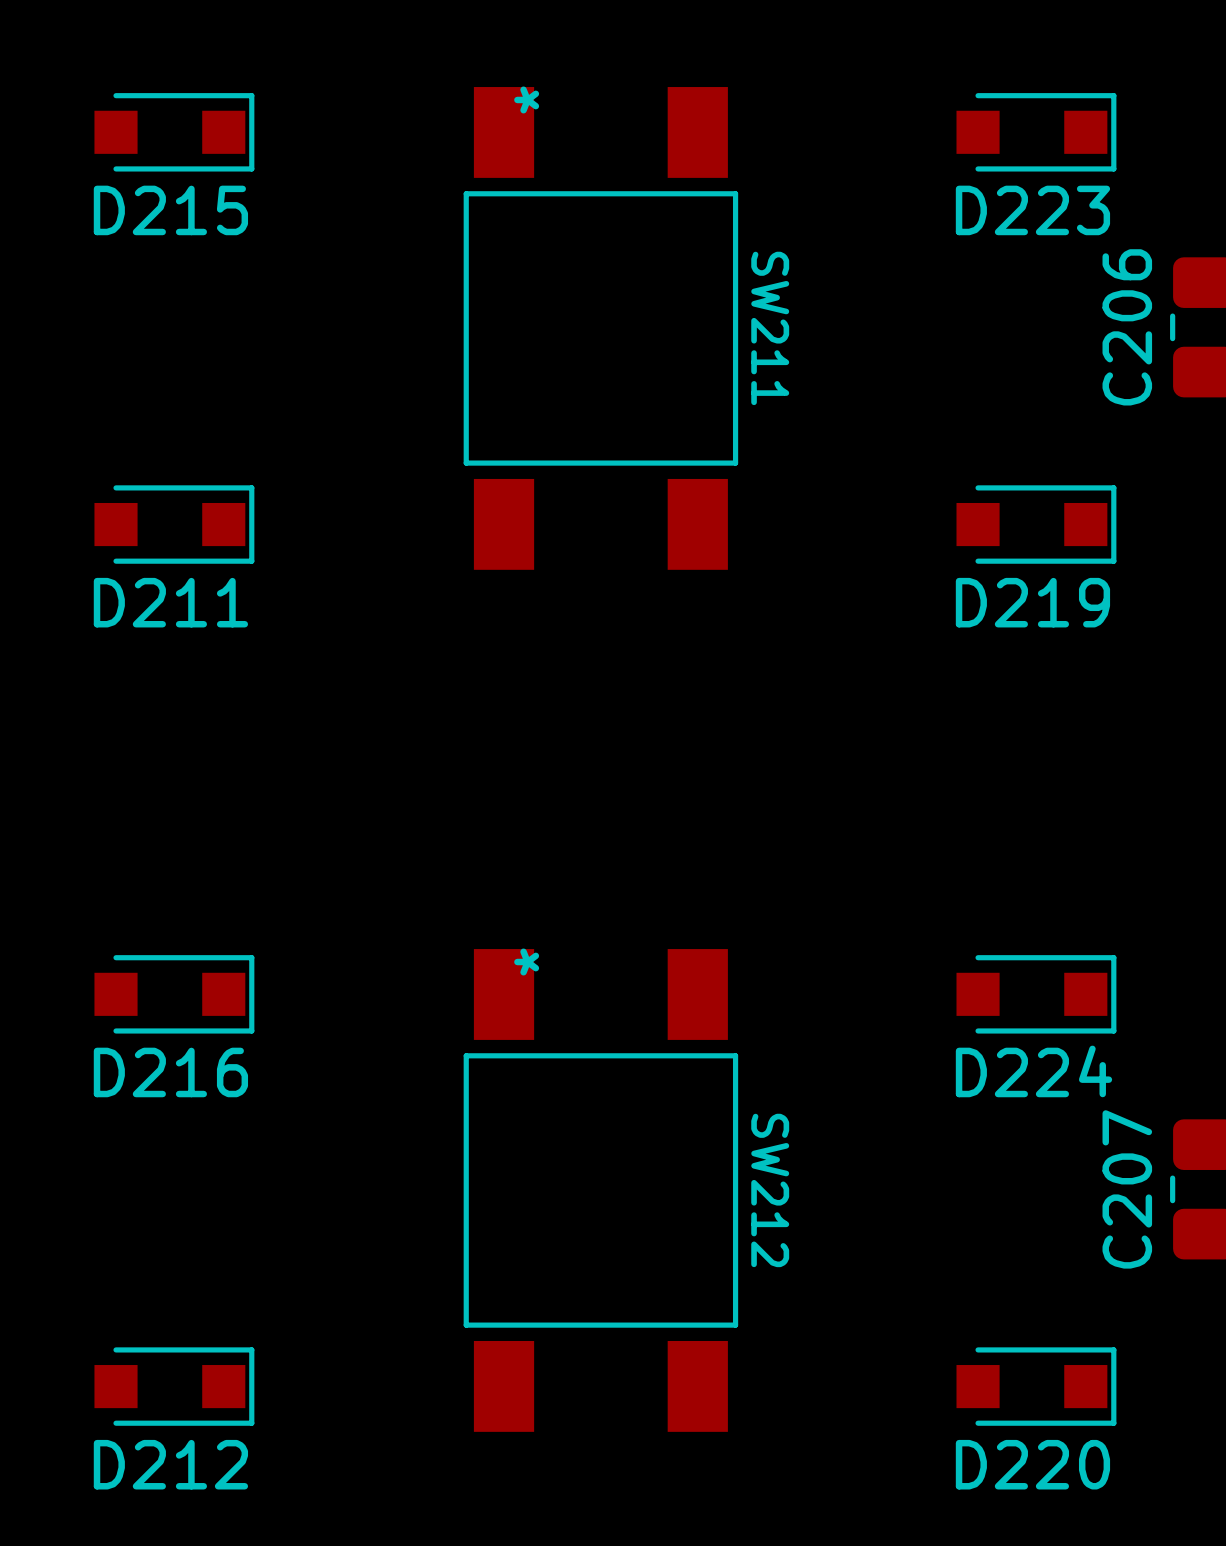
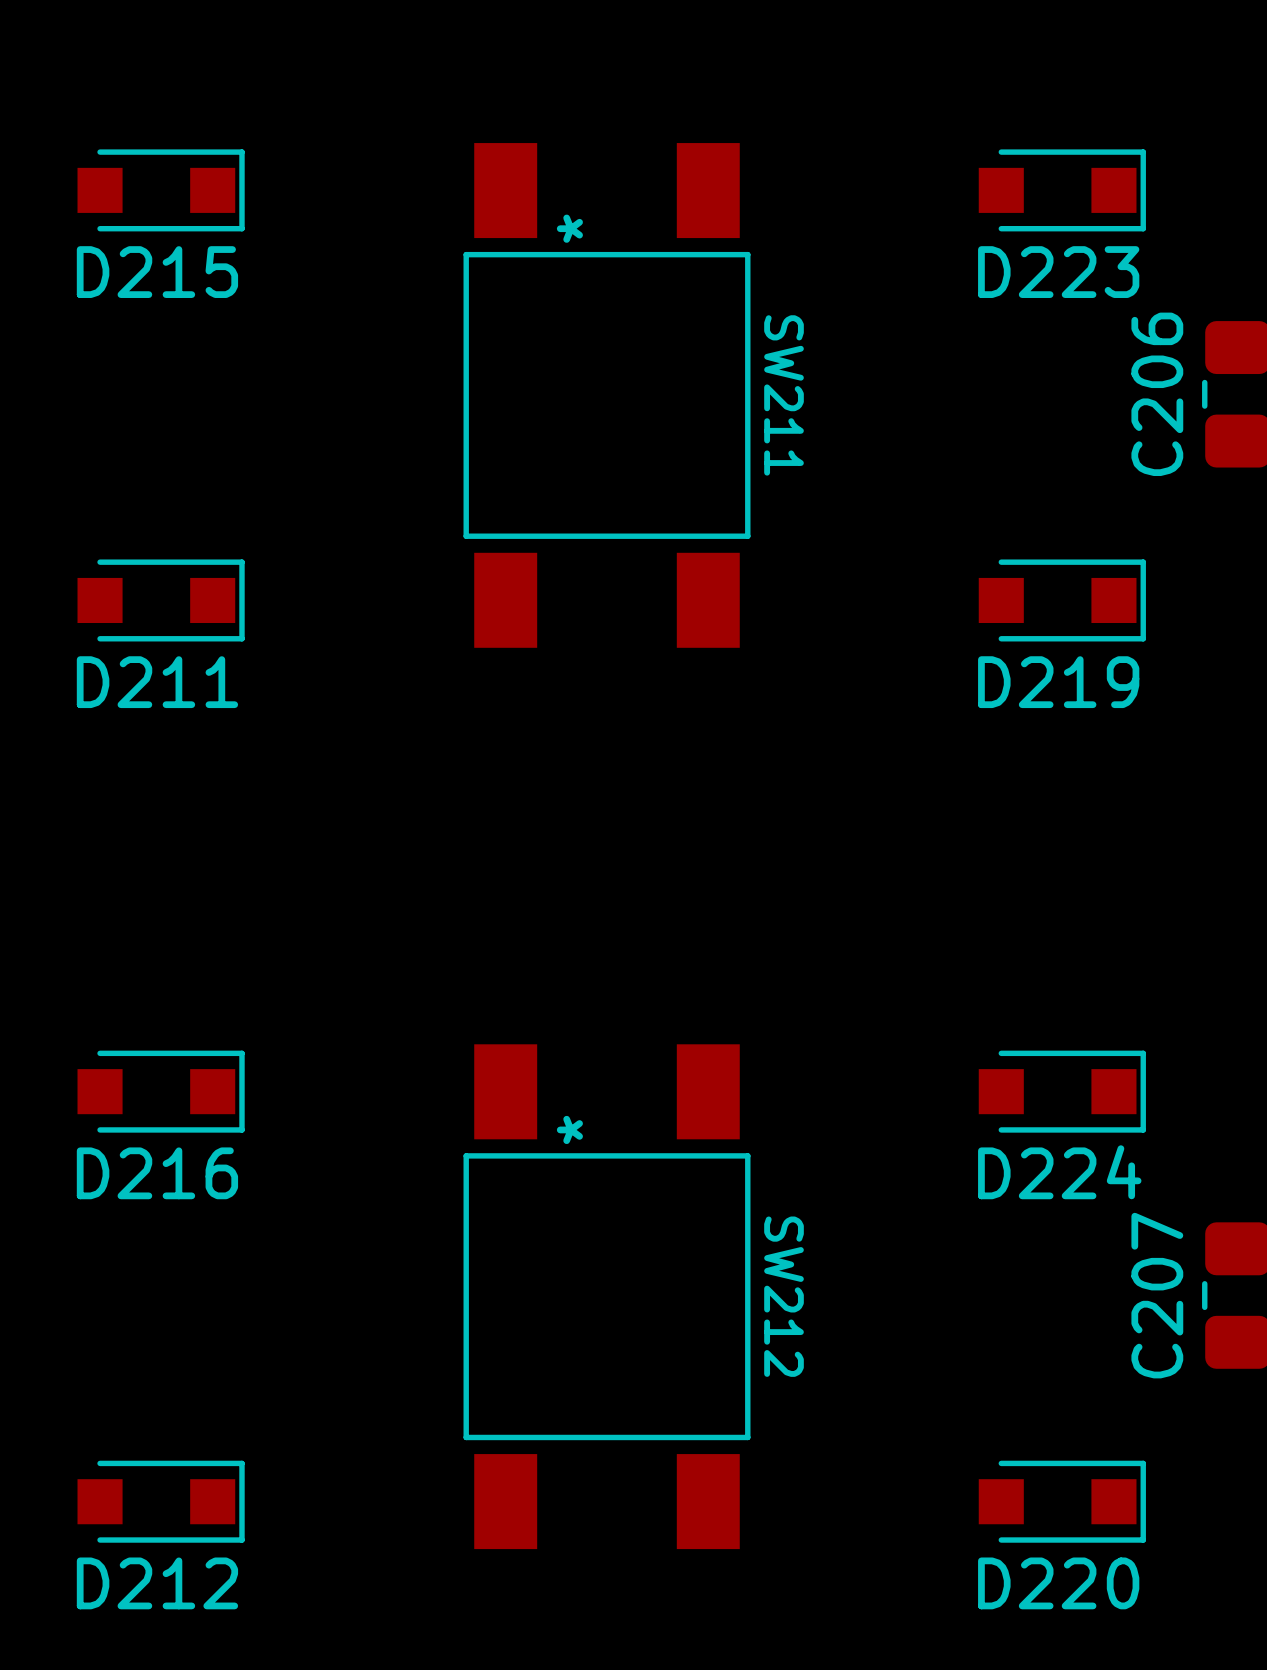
SW211 text position: * (526, 99) -> * (569, 228)
SW212 text position: * (526, 962) -> * (569, 1129)

